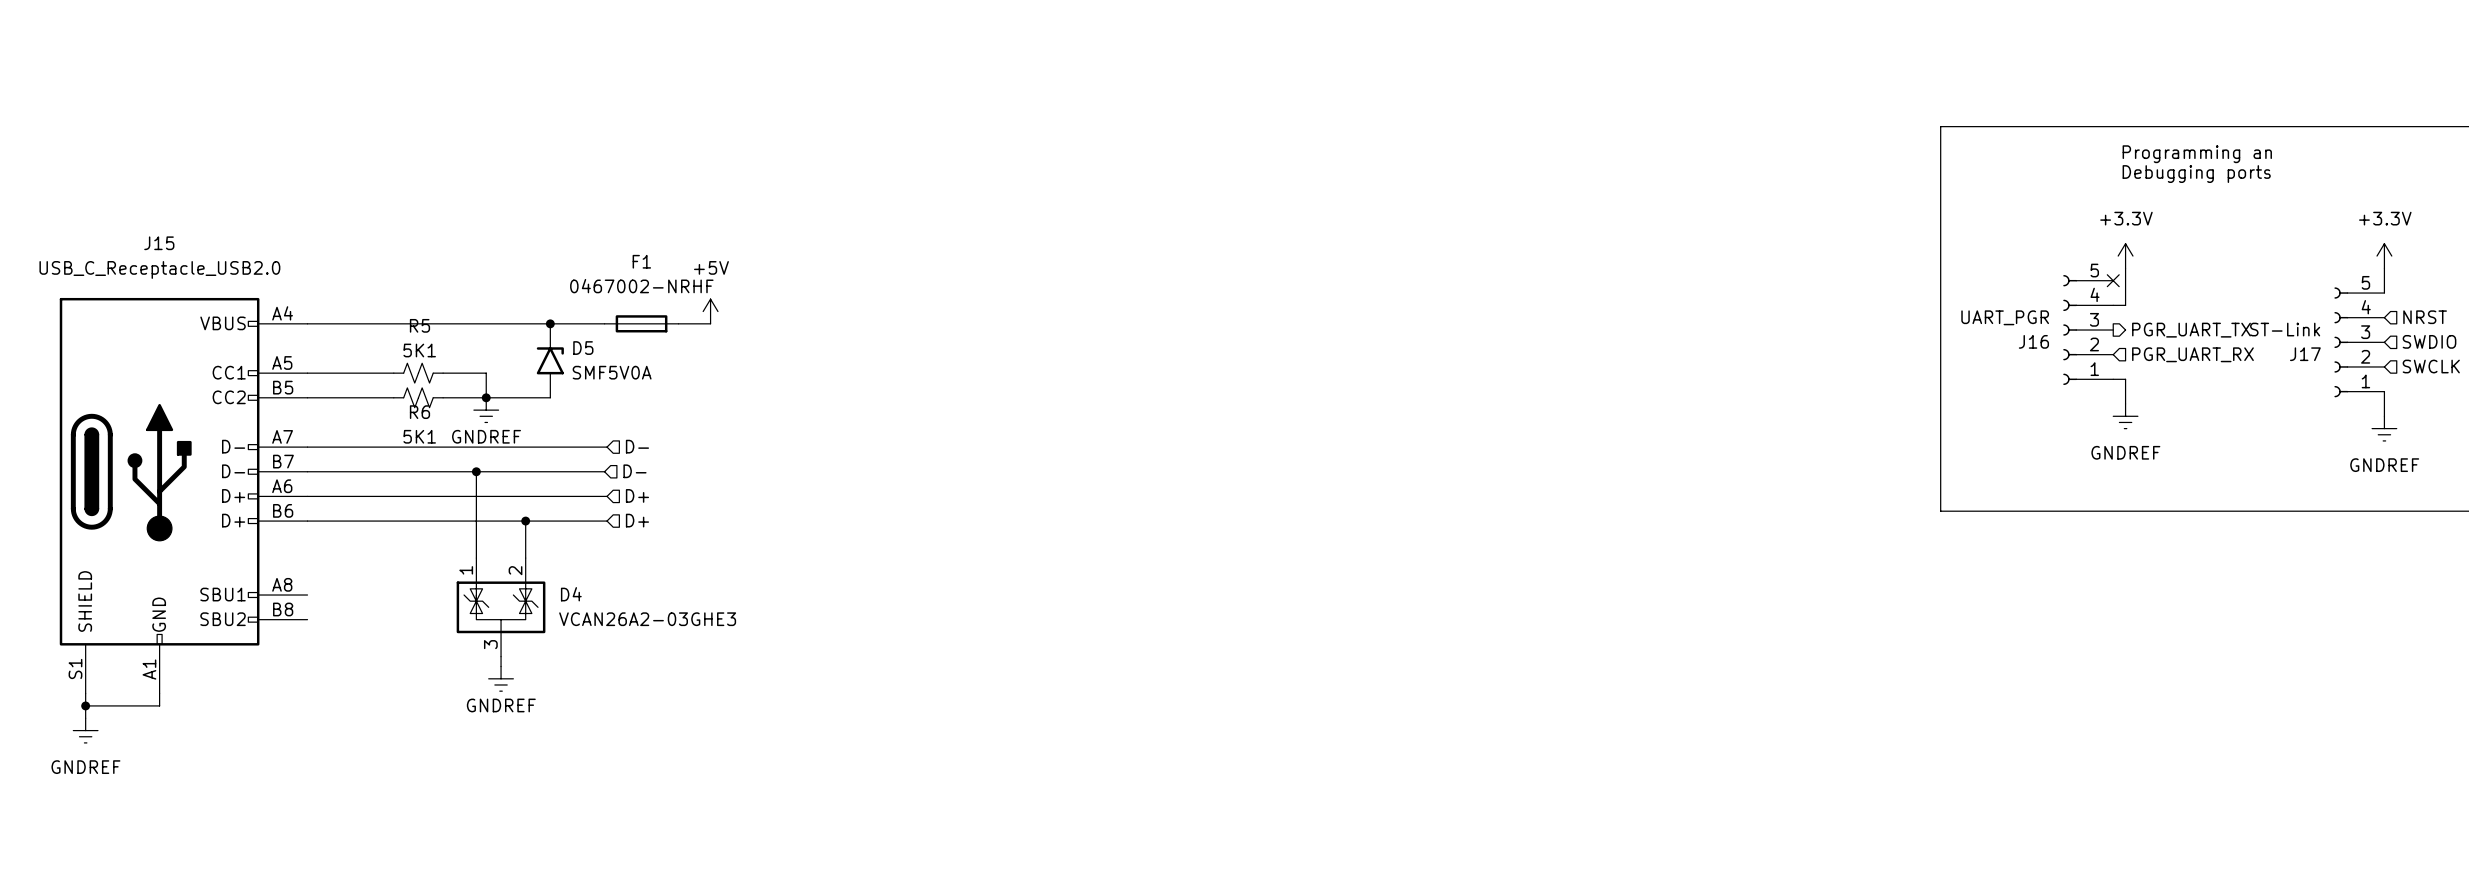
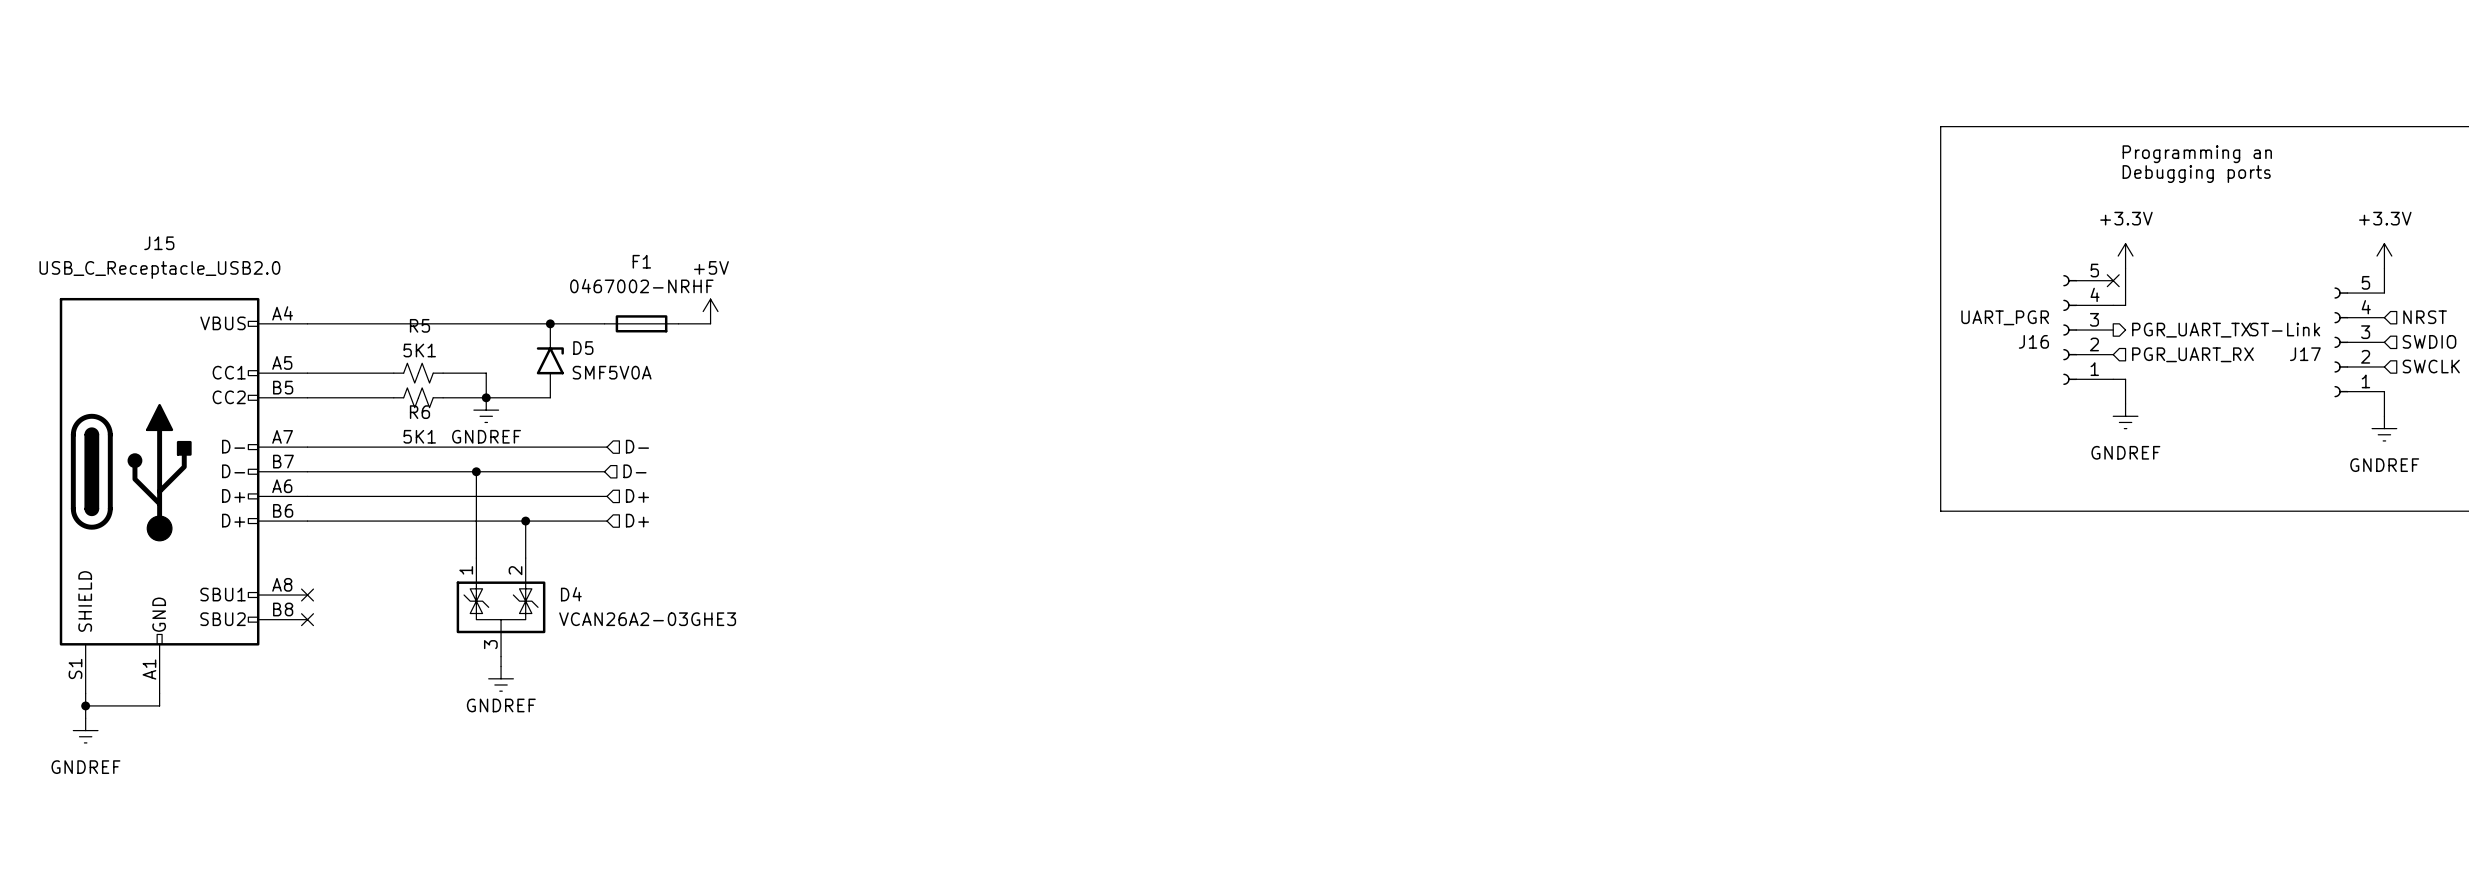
no-connect mark: none -> (307, 595)
no-connect mark: none -> (307, 619)

